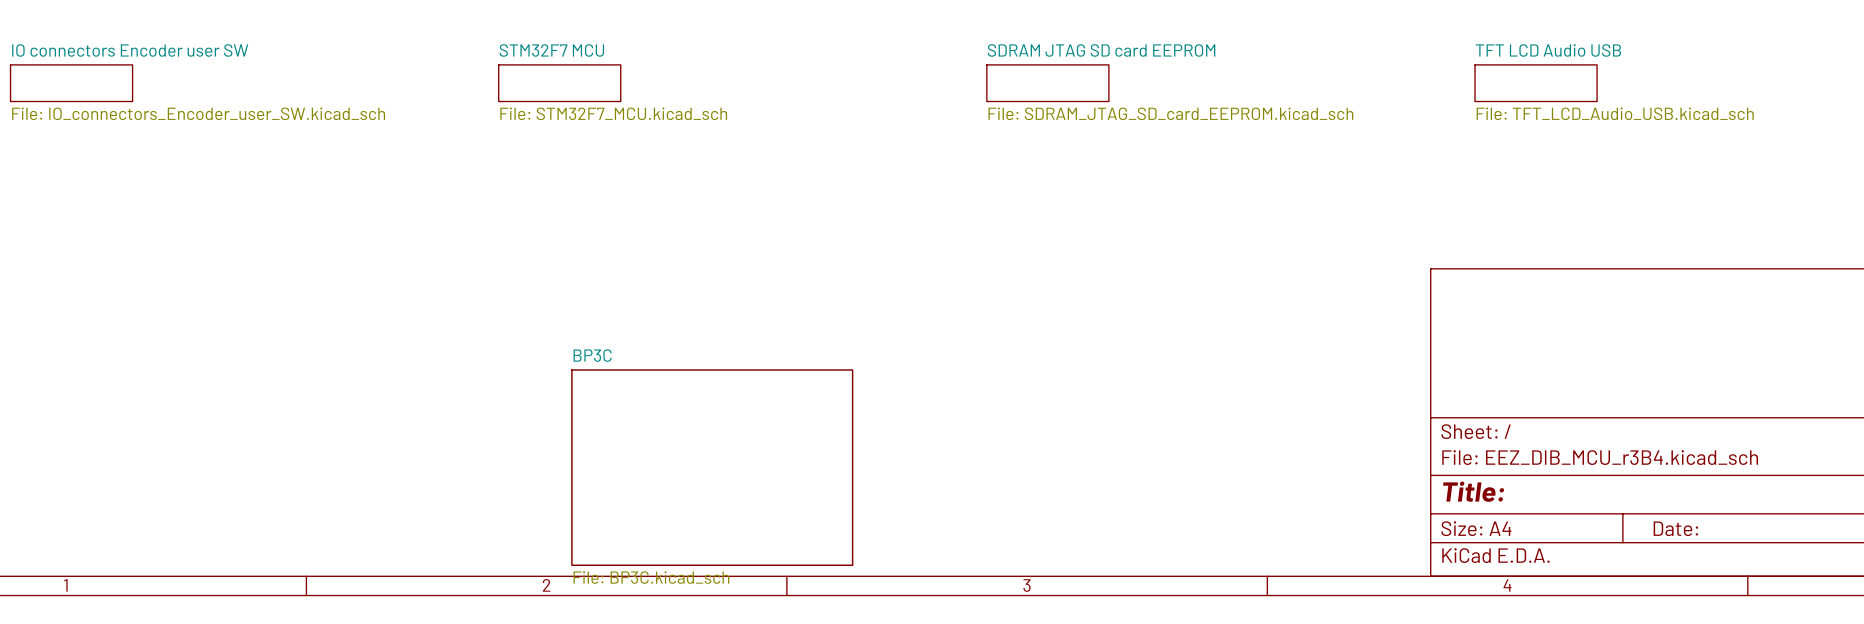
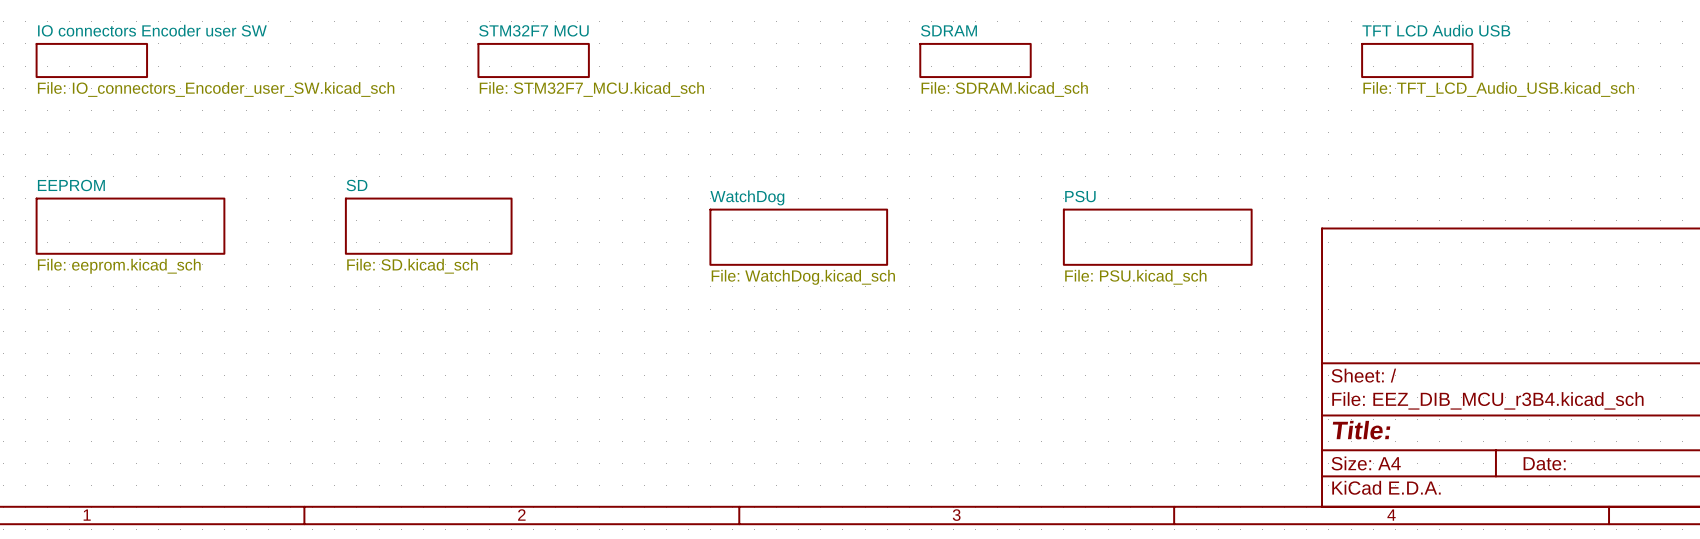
sheet SDRAM JTAG SD card EEPROM name: SDRAM JTAG SD card EEPROM (1101, 50) -> SDRAM (948, 30)
sheet SDRAM JTAG SD card EEPROM value: File: SDRAM_JTAG_SD_card_EEPROM.kicad_sch (1170, 113) -> File: SDRAM.kicad_sch (1004, 89)
sheet EEPROM: none -> File: eeprom.kicad_sch (130, 226)
sheet SD: none -> File: SD.kicad_sch (428, 226)
sheet WatchDog: none -> File: WatchDog.kicad_sch (798, 237)
sheet PSU: none -> File: PSU.kicad_sch (1157, 237)
sheet BP3C: File: BP3C.kicad_sch (712, 467) -> none

